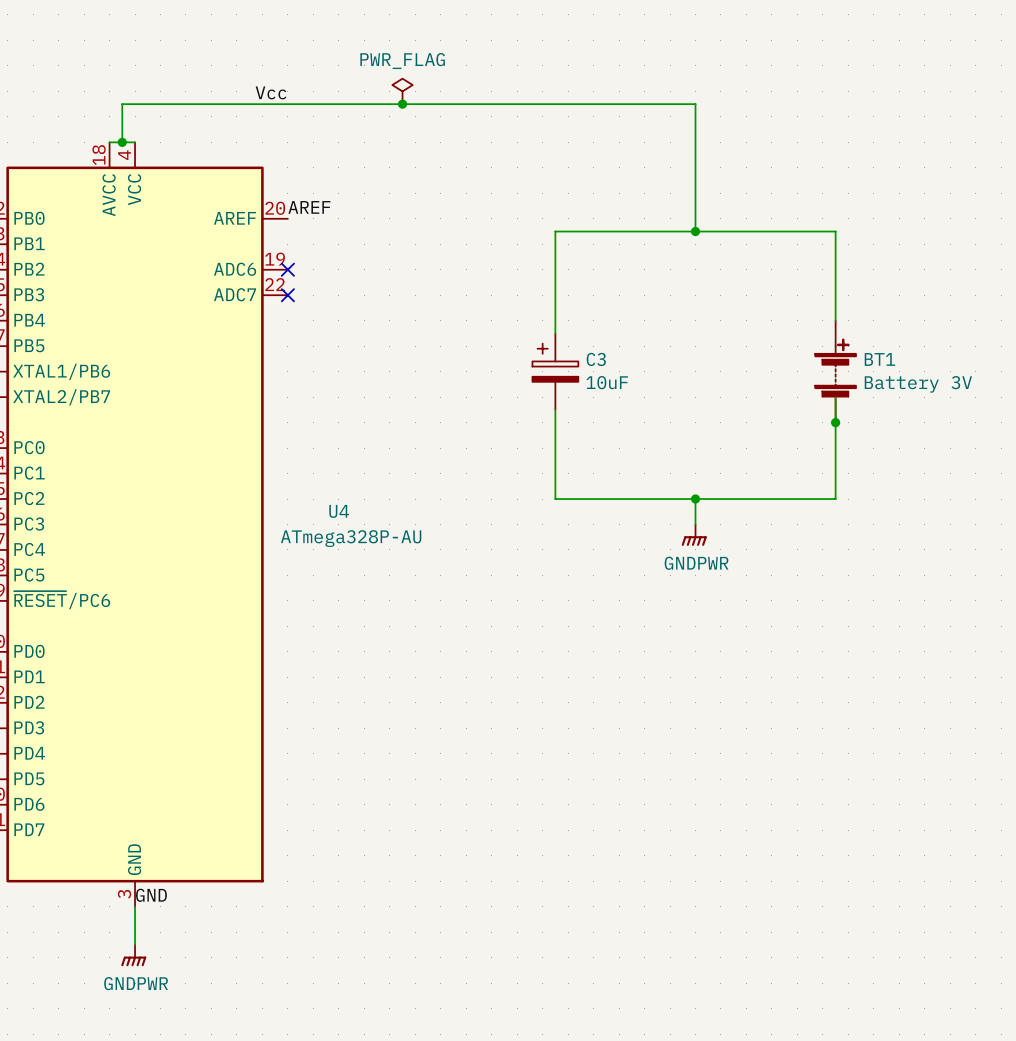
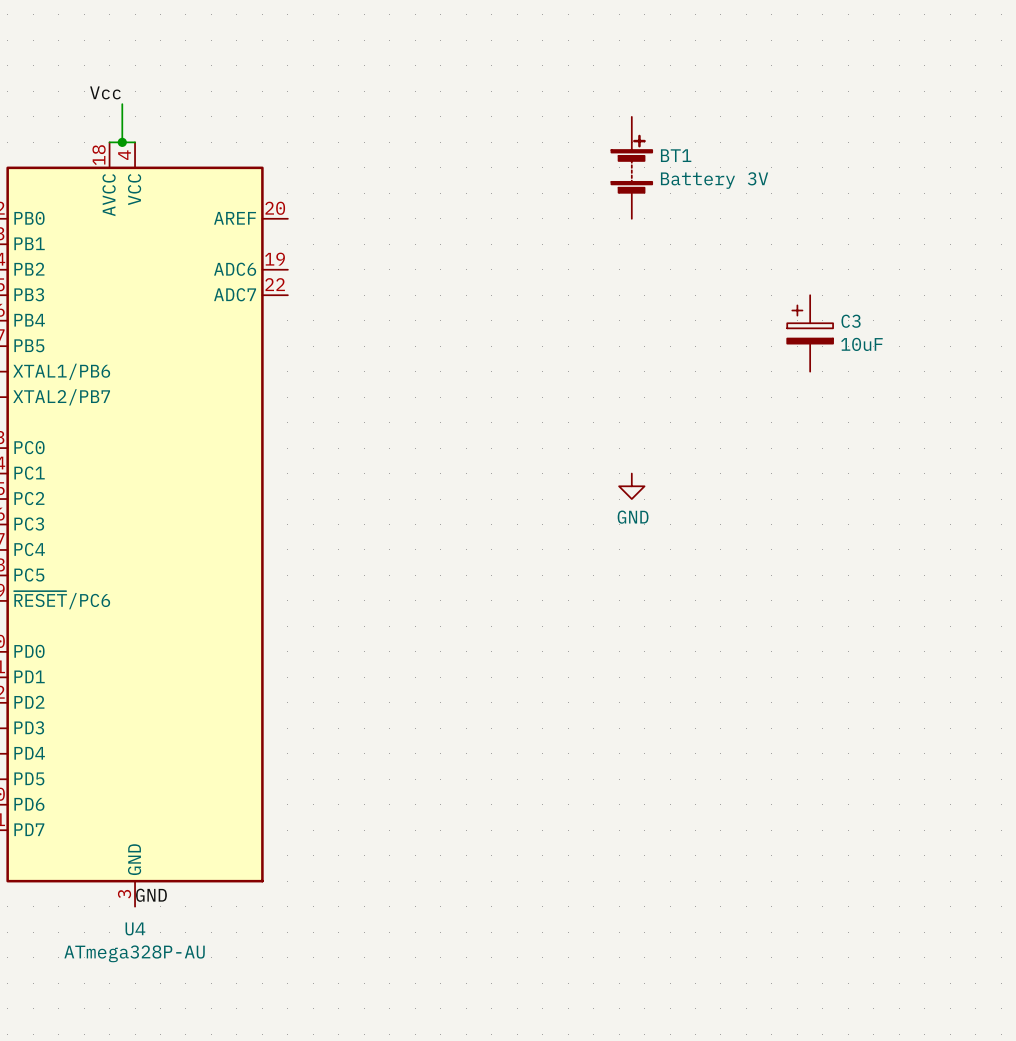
power symbol: PWR_FLAG (402, 91) -> none
label position: Vcc (271, 92) -> Vcc (105, 92)
wire: (122, 104) (695, 104) (695, 231) -> none
junction: (402, 104) -> none
label: AREF (309, 207) -> none
junction: (695, 231) -> none
no-connect mark: (287, 269) -> none
no-connect mark: (287, 295) -> none
wire: (835, 320) (835, 231) (555, 231) (555, 333) -> none
C3 position: (555, 371) -> (810, 333)
BT1 position: (835, 371) -> (631, 167)
wire: (835, 397) (835, 499) (555, 499) (555, 409) -> none
junction: (835, 422) -> none
power symbol: none -> GND (631, 486)
wire: (695, 499) (695, 524) -> none
junction: (695, 499) -> none
U4 name position: U4 (339, 511) -> U4 (135, 928)
power symbol: GNDPWR (694, 535) -> none
U4 value position: ATmega328P-AU (351, 538) -> ATmega328P-AU (134, 953)
wire: (135, 906) (135, 944) -> none
power symbol: GNDPWR (133, 955) -> none

